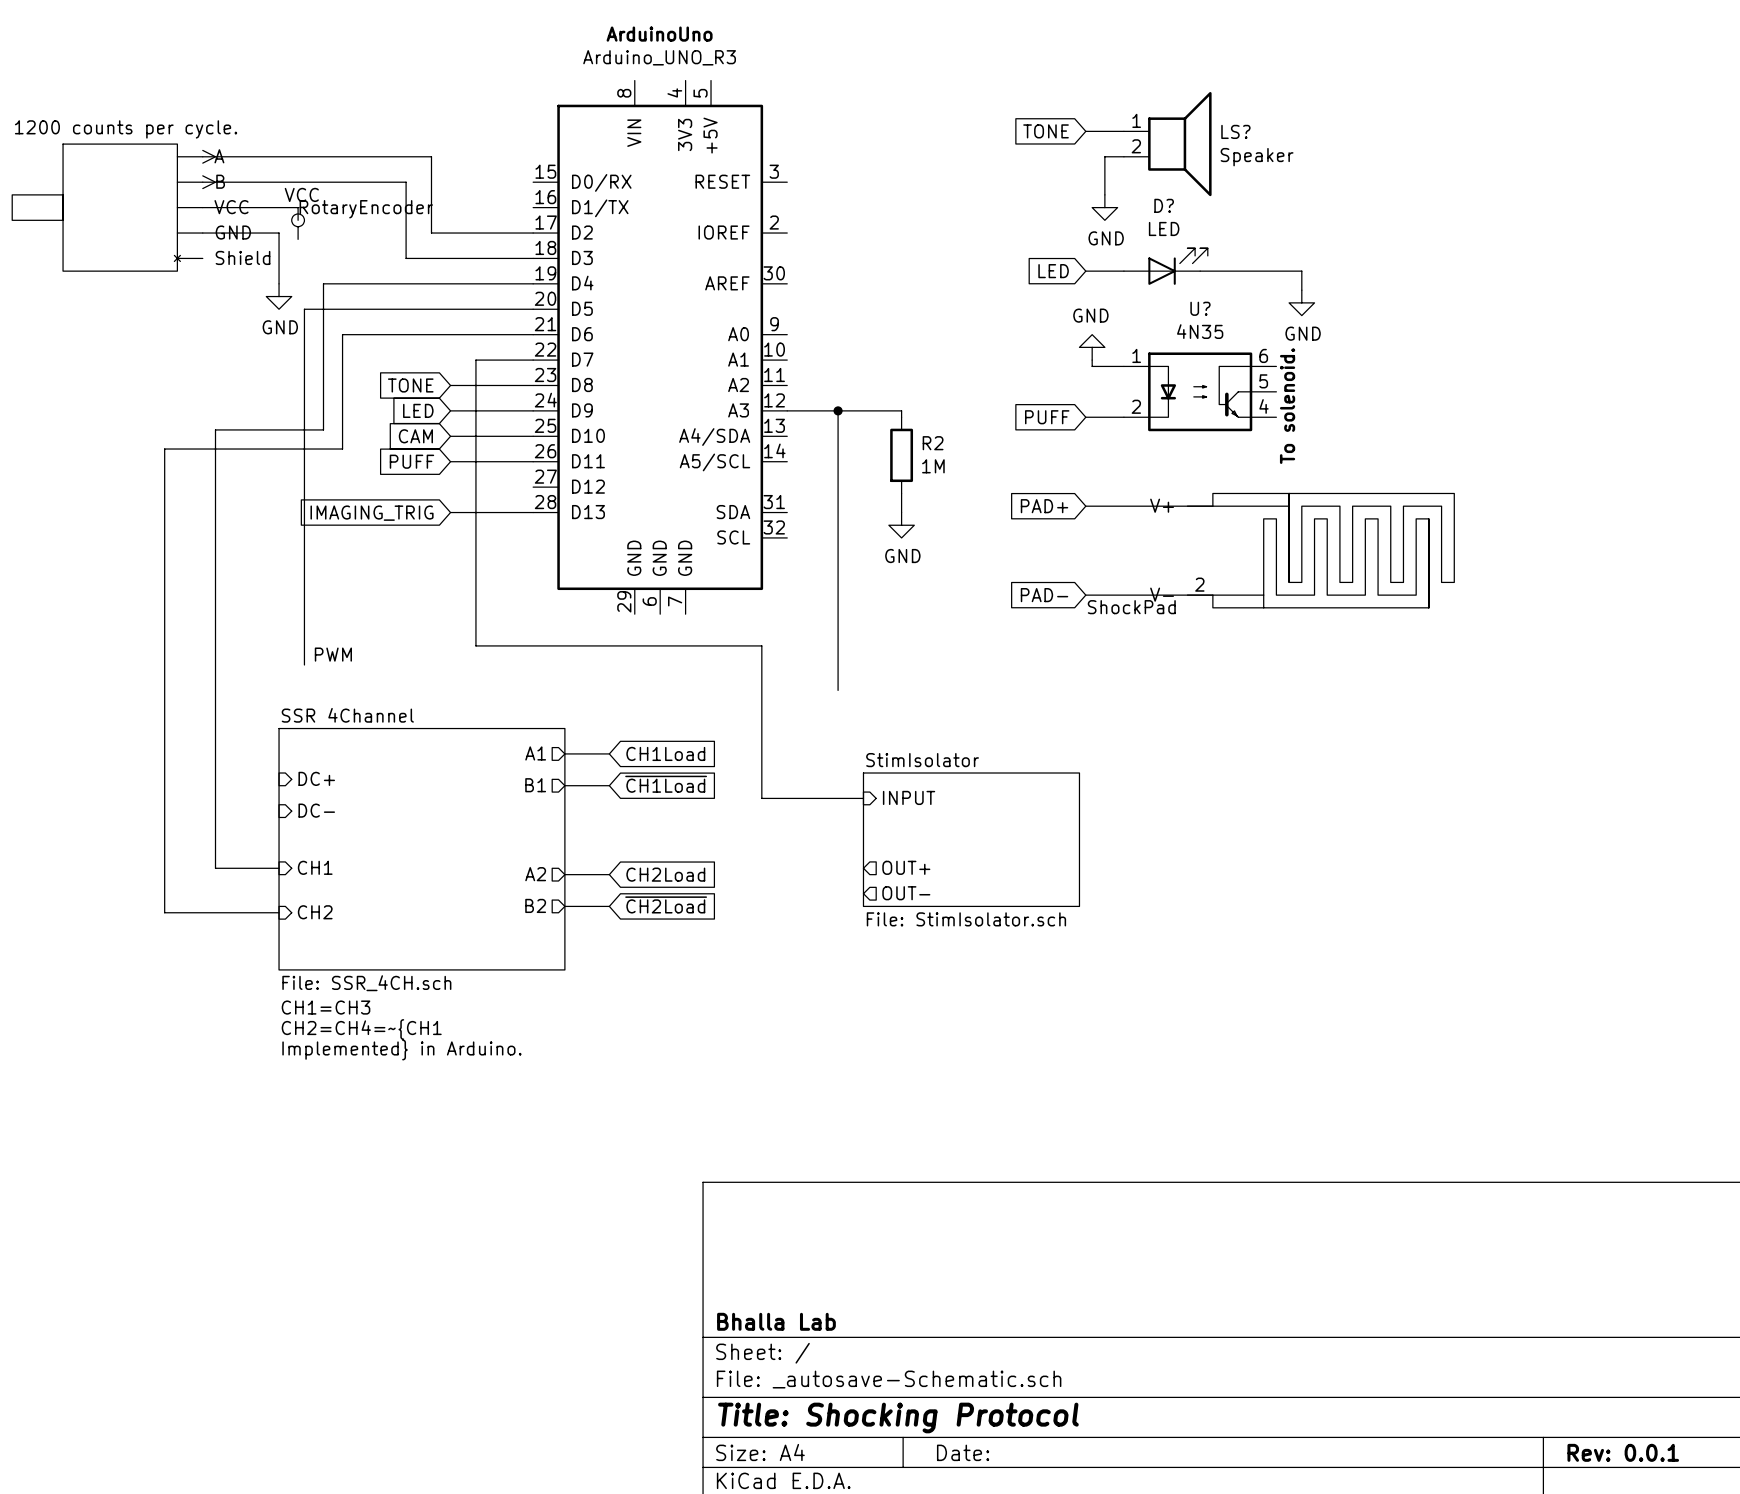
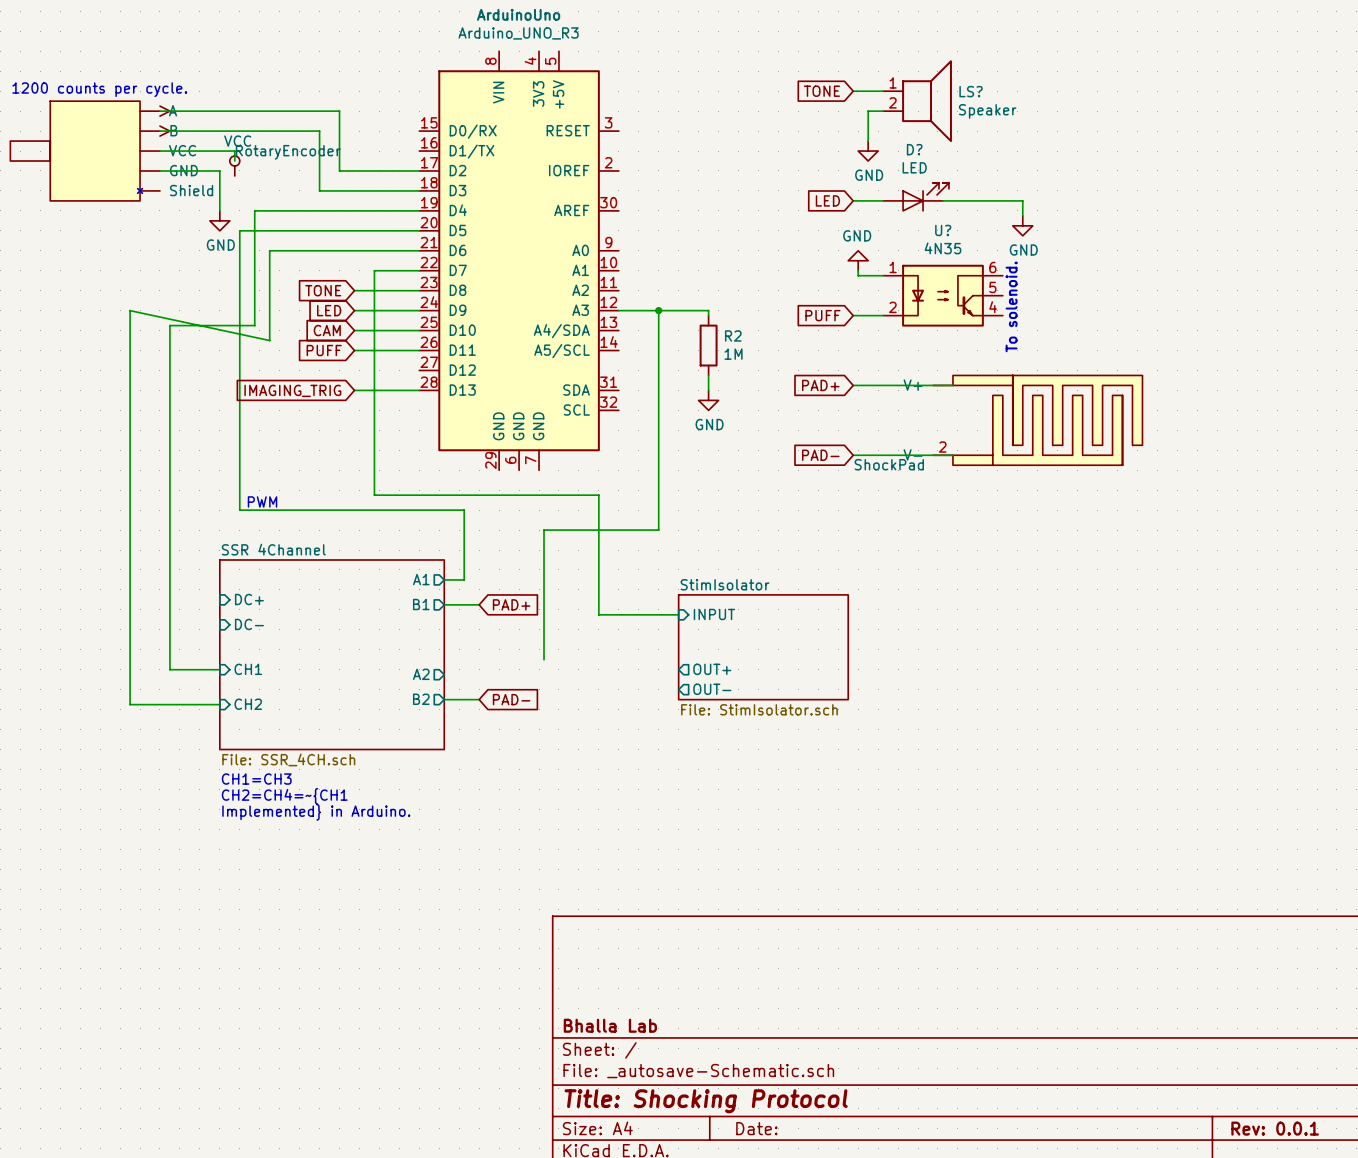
wire: (164, 449) (342, 449) -> (130, 340) (130, 310) (269, 340)
wire: none -> (658, 530) (544, 530) (544, 659)
wire: (590, 753) (609, 753) -> (464, 579) (464, 510) (239, 510)
global label: CH1Load (665, 753) -> none
global label: ~{CH1Load} (666, 784) -> PAD+ (511, 604)
wire: (564, 874) (609, 874) -> none
global label: CH2Load (665, 874) -> none
global label: ~{CH2Load} (666, 904) -> PAD- (511, 699)

